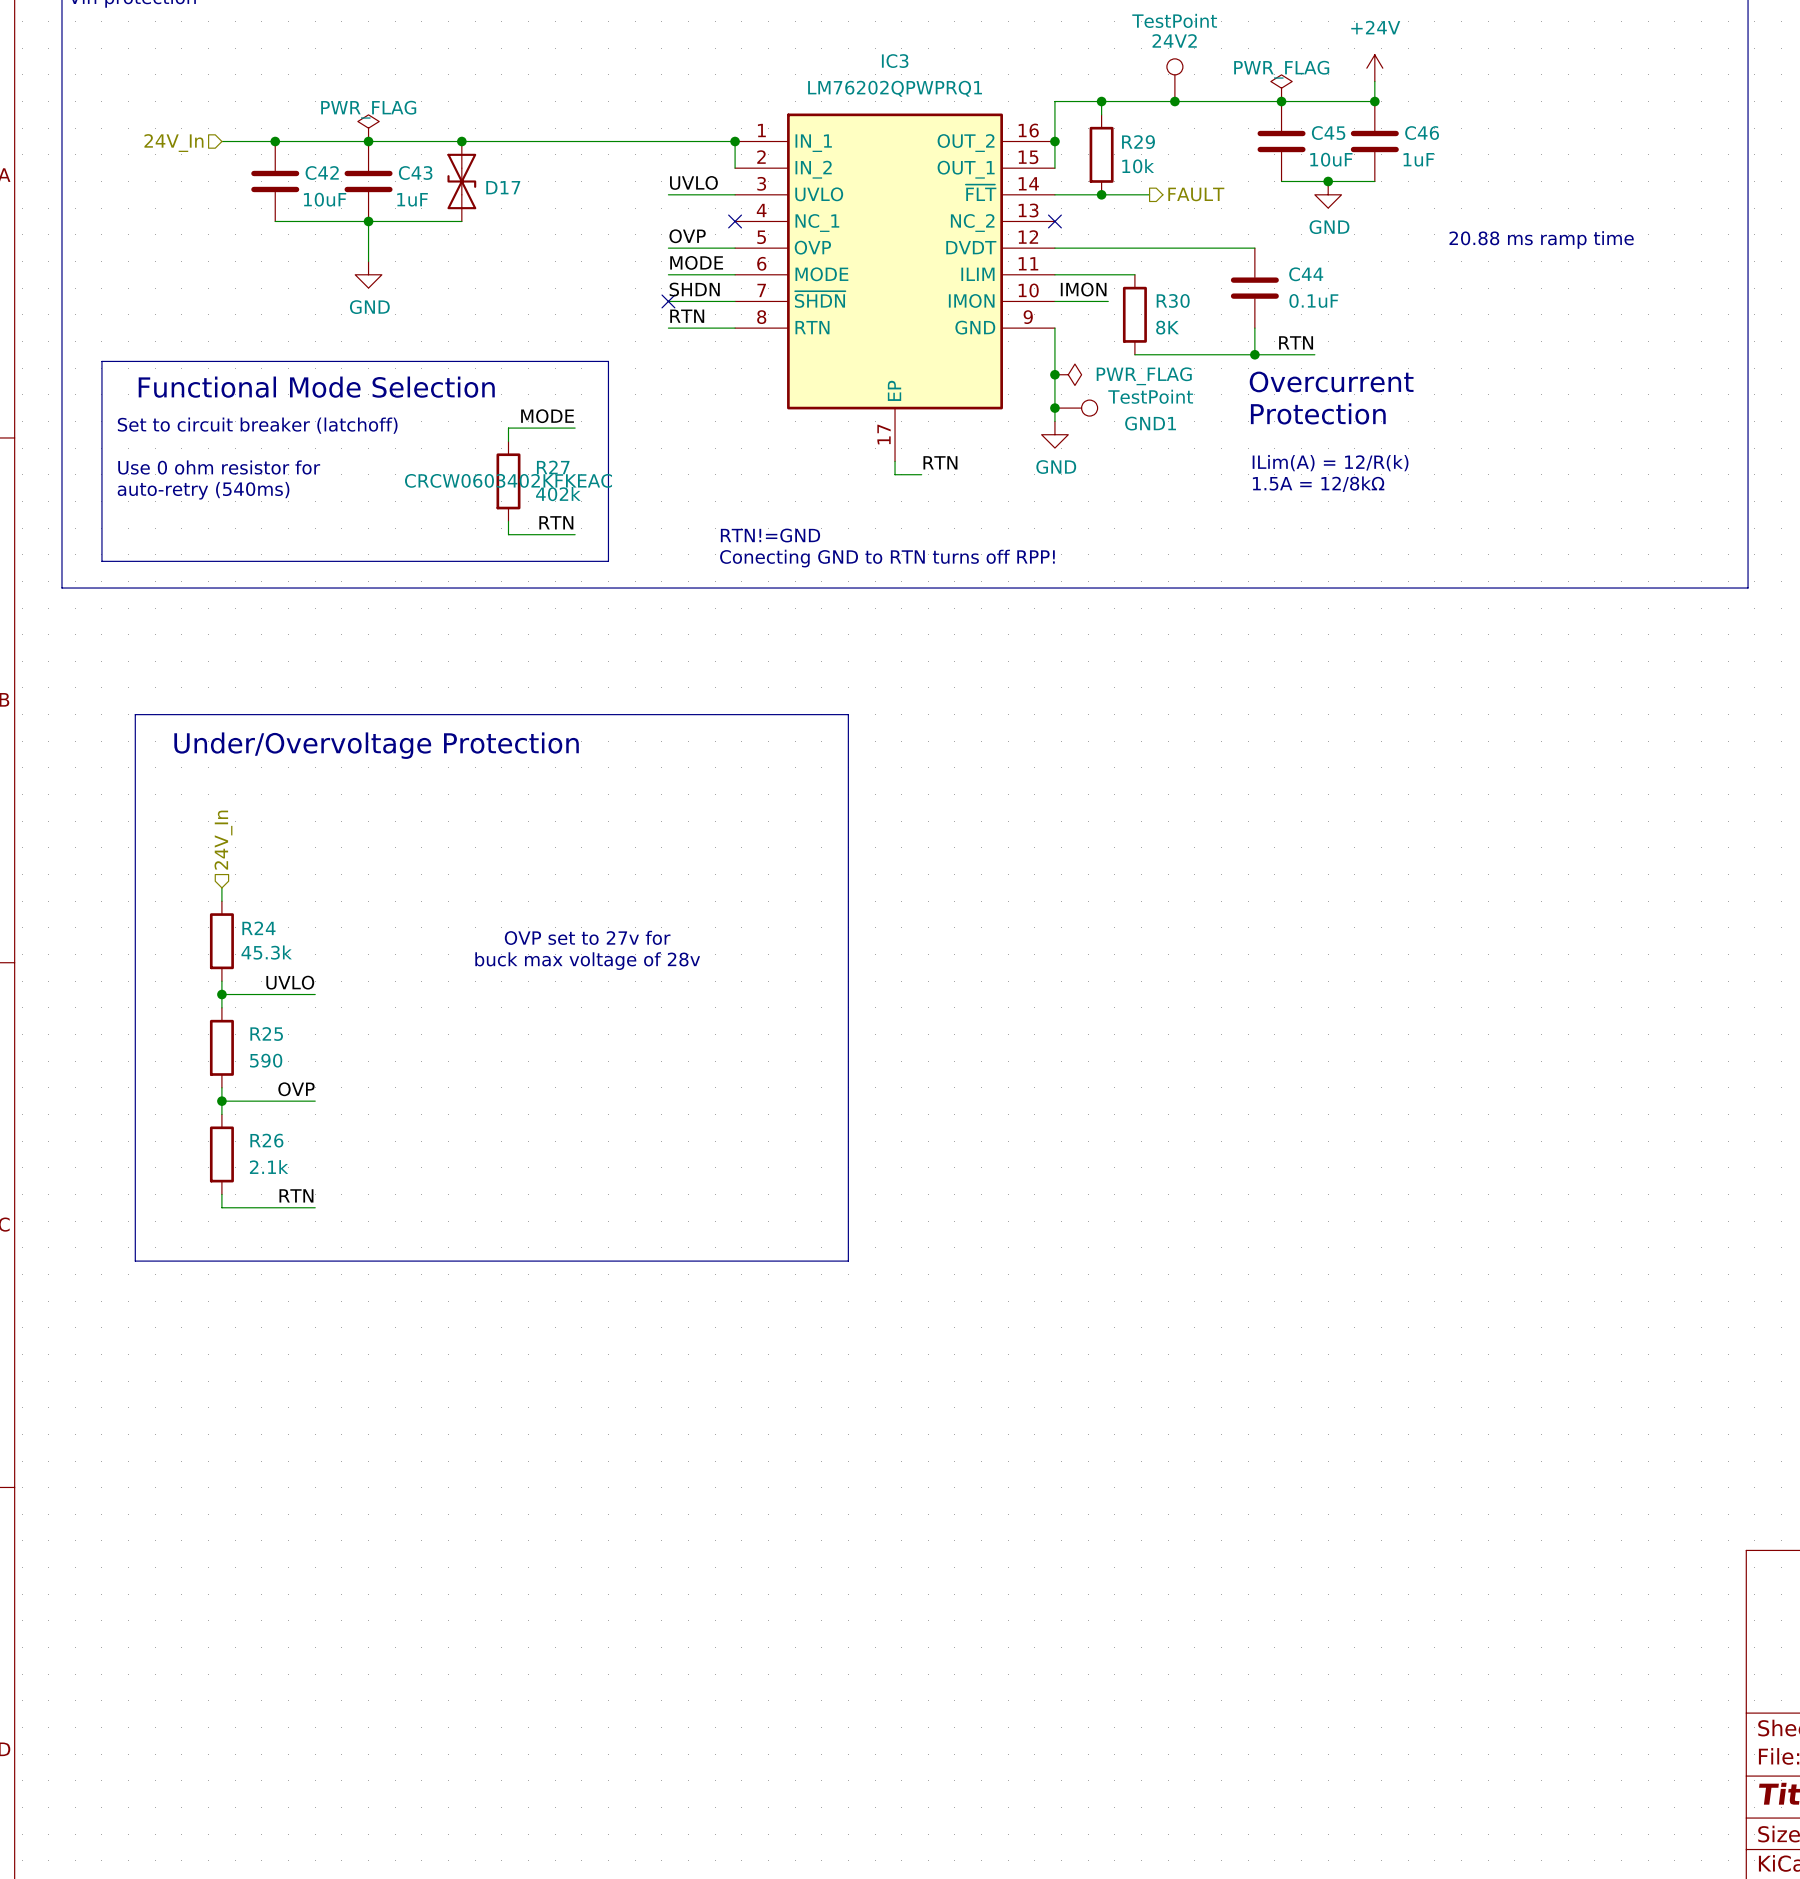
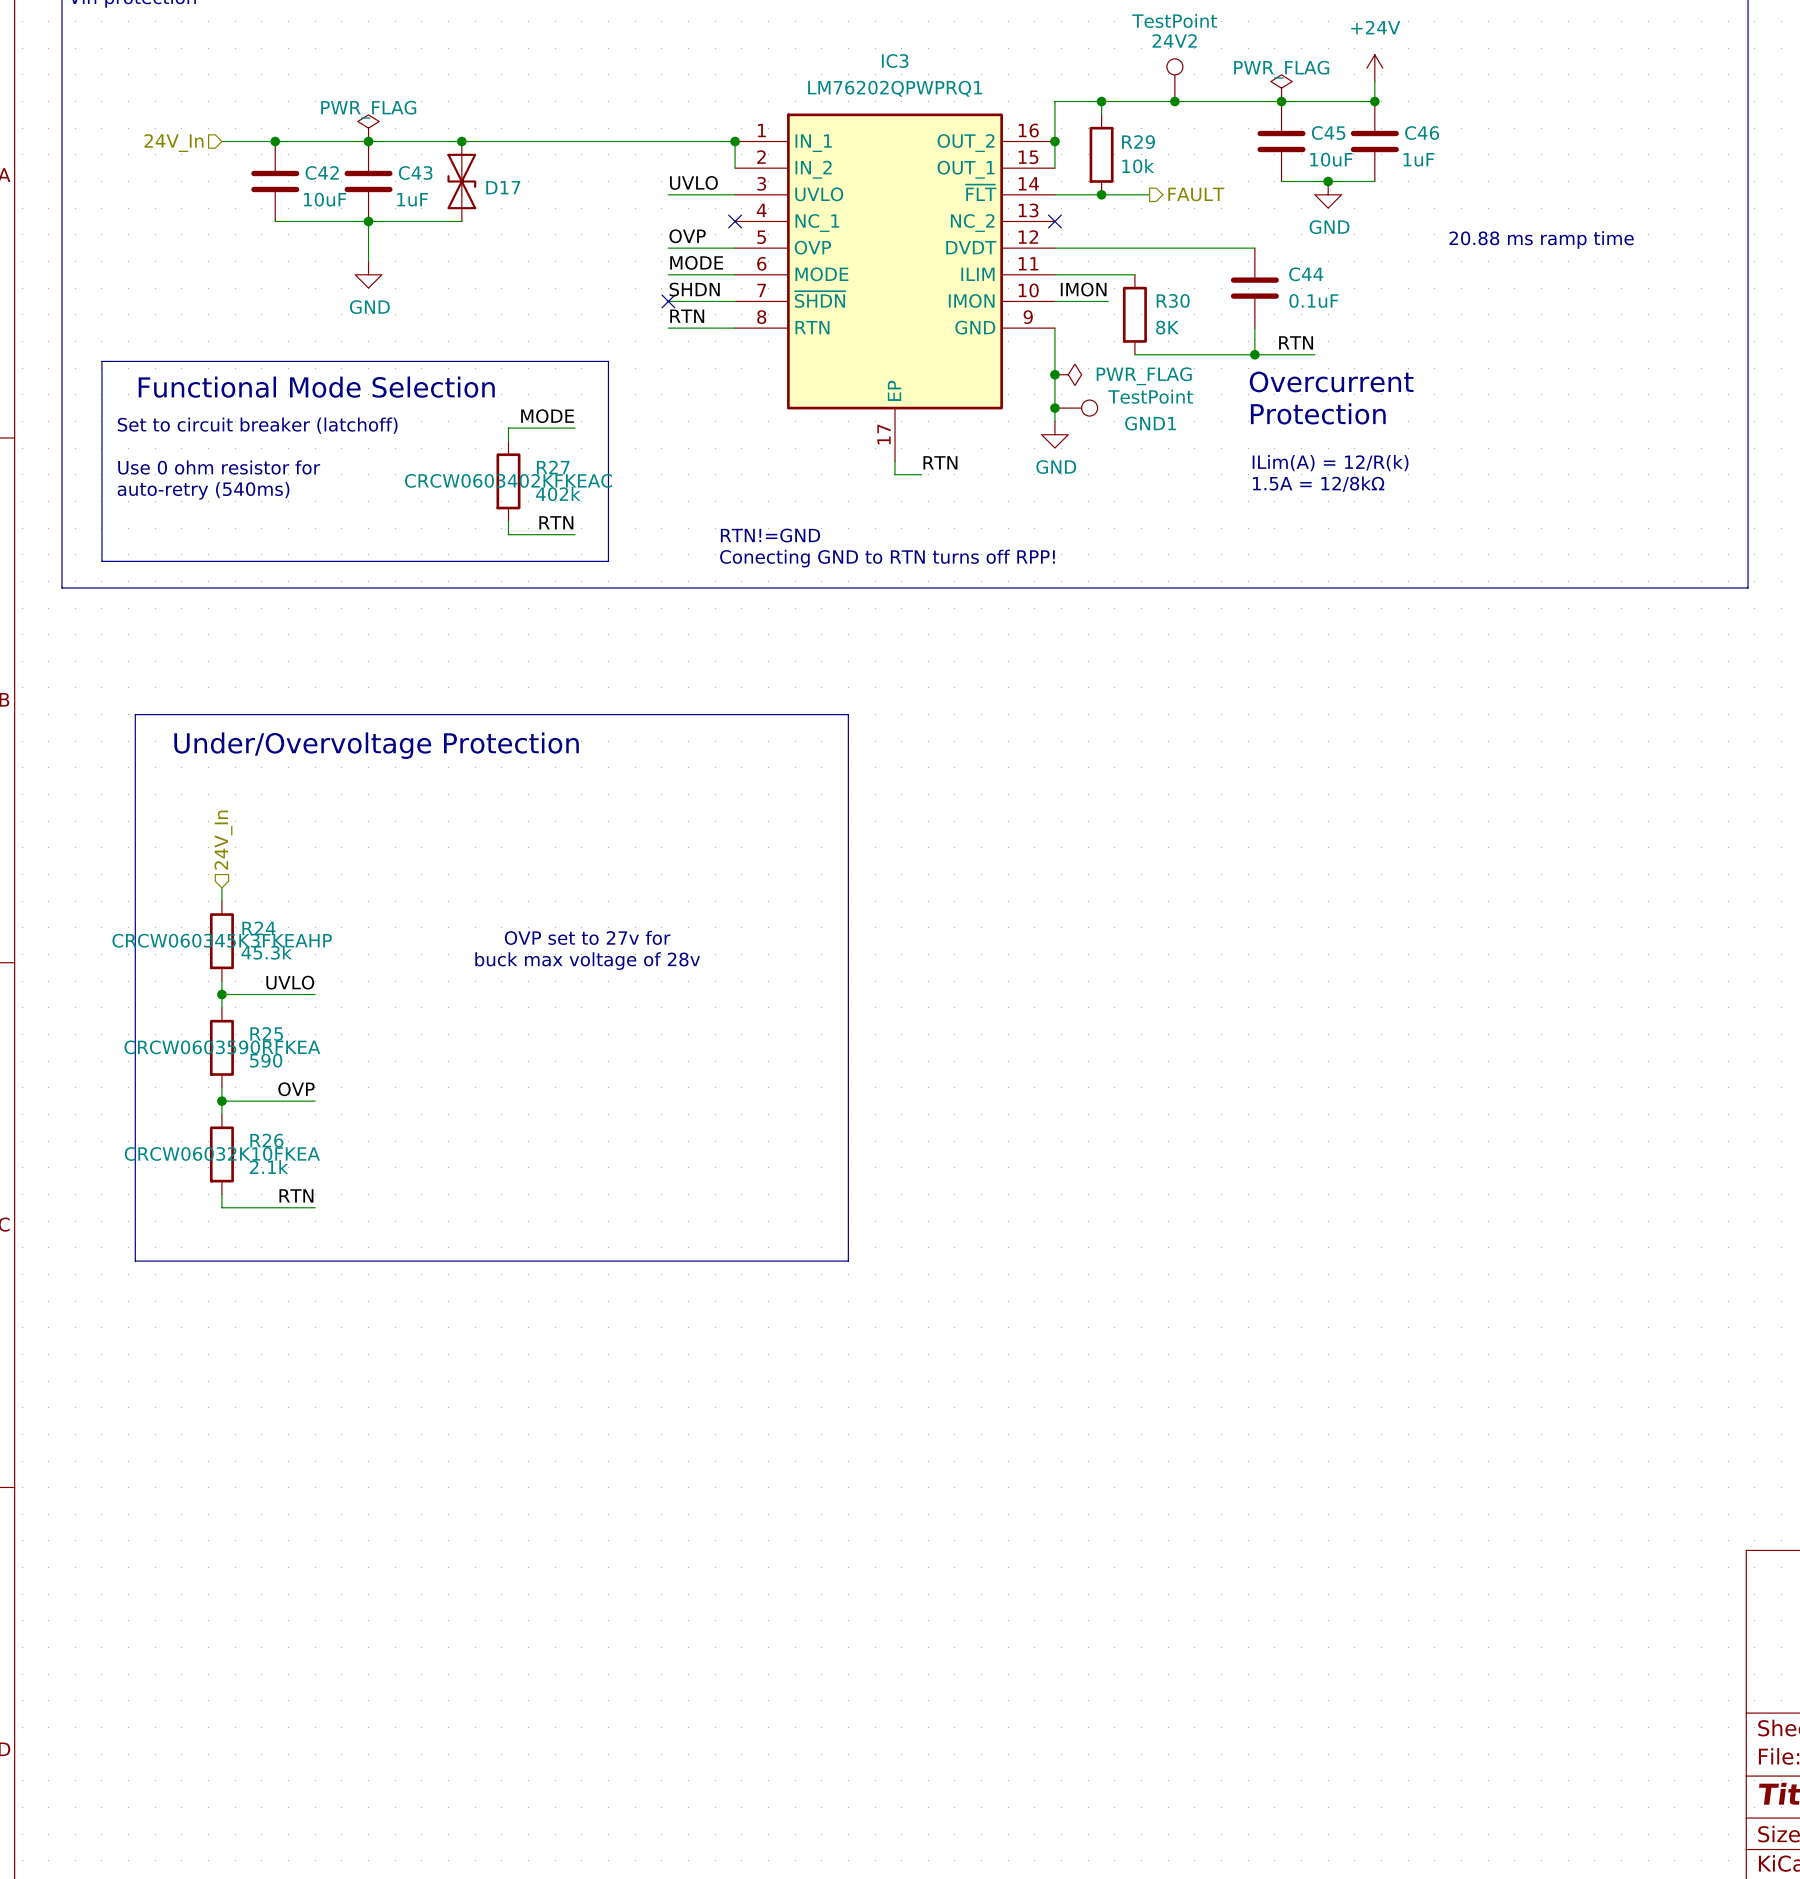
R24 text: none -> CRCW060345K3FKEAHP (222, 940)
R25 text: none -> CRCW0603590RFKEA (222, 1047)
R26 text: none -> CRCW06032K10FKEA (222, 1153)

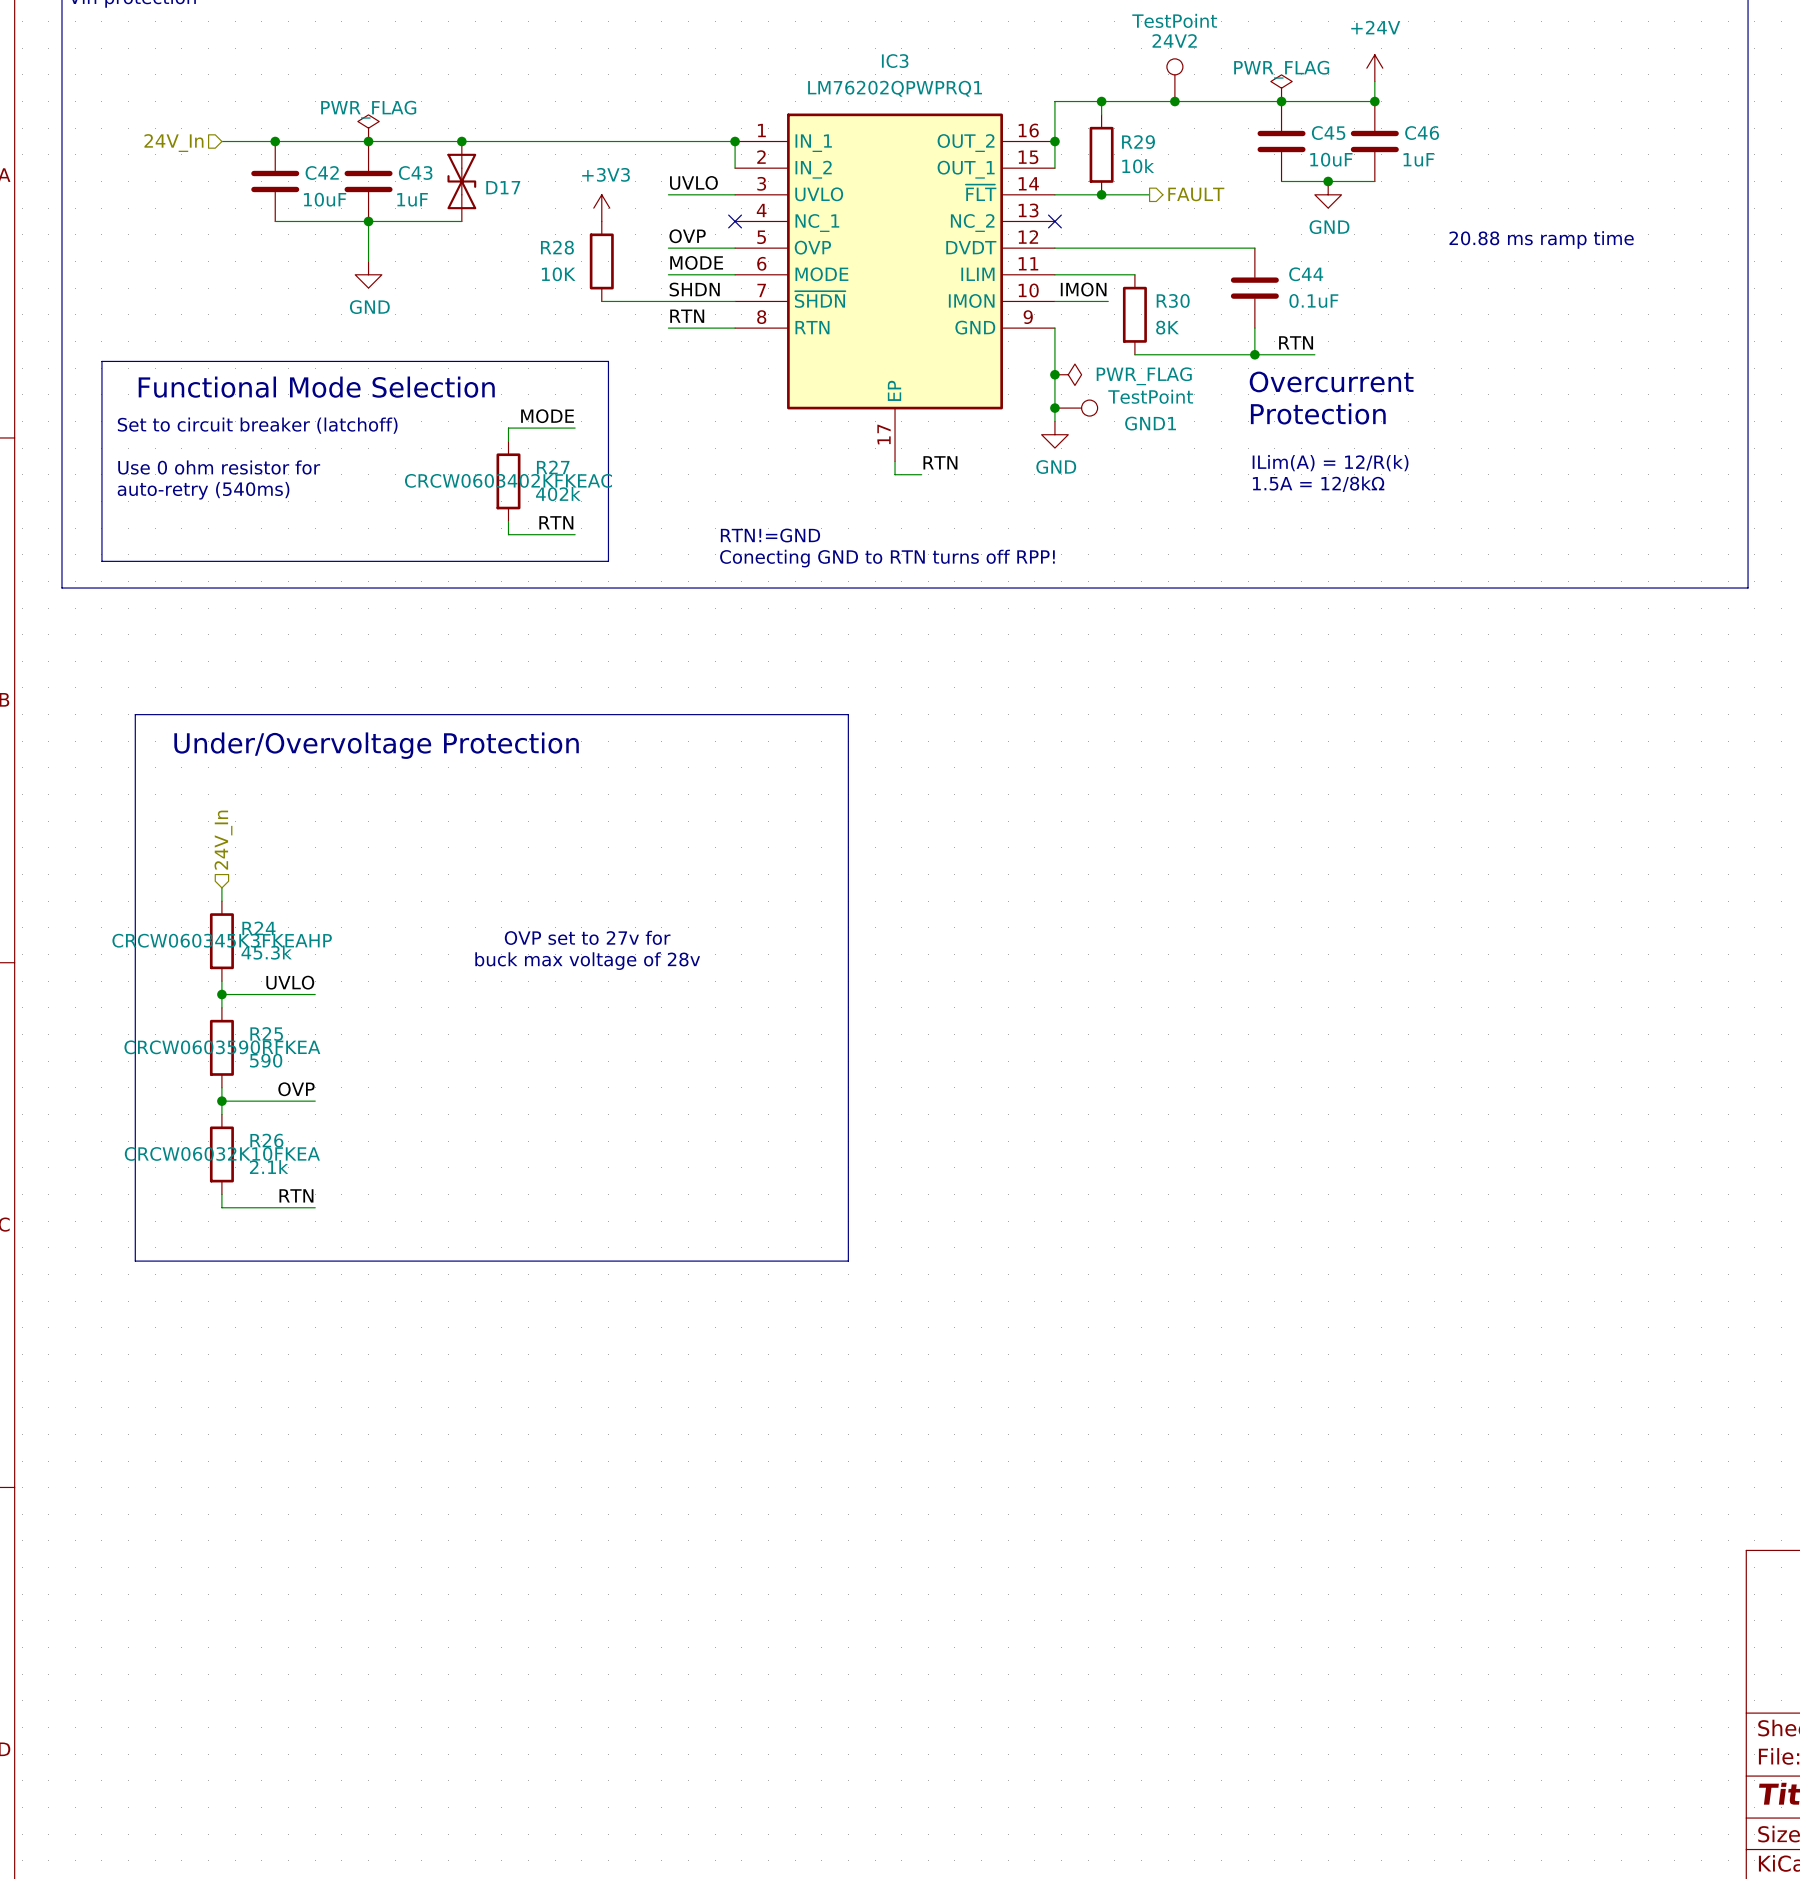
power symbol: none -> +3V3 (601, 208)
R28: none -> 10K (601, 261)
wire: none -> (601, 301) (668, 301)
no-connect mark: (668, 301) -> none

